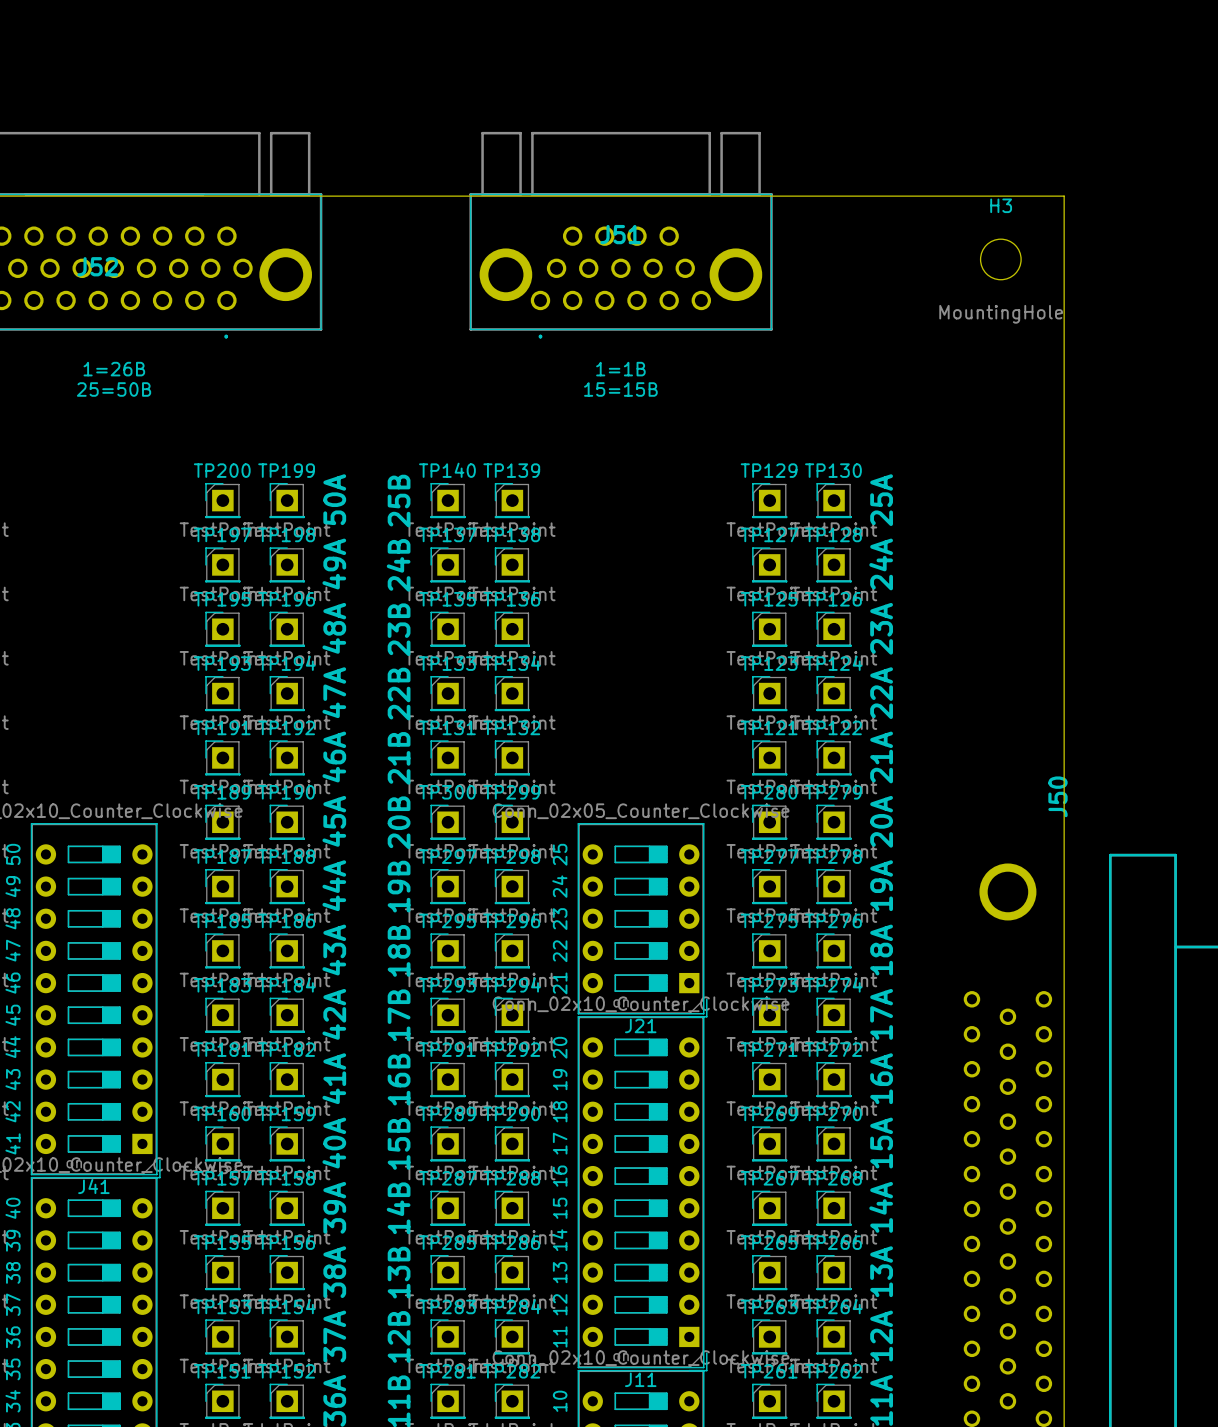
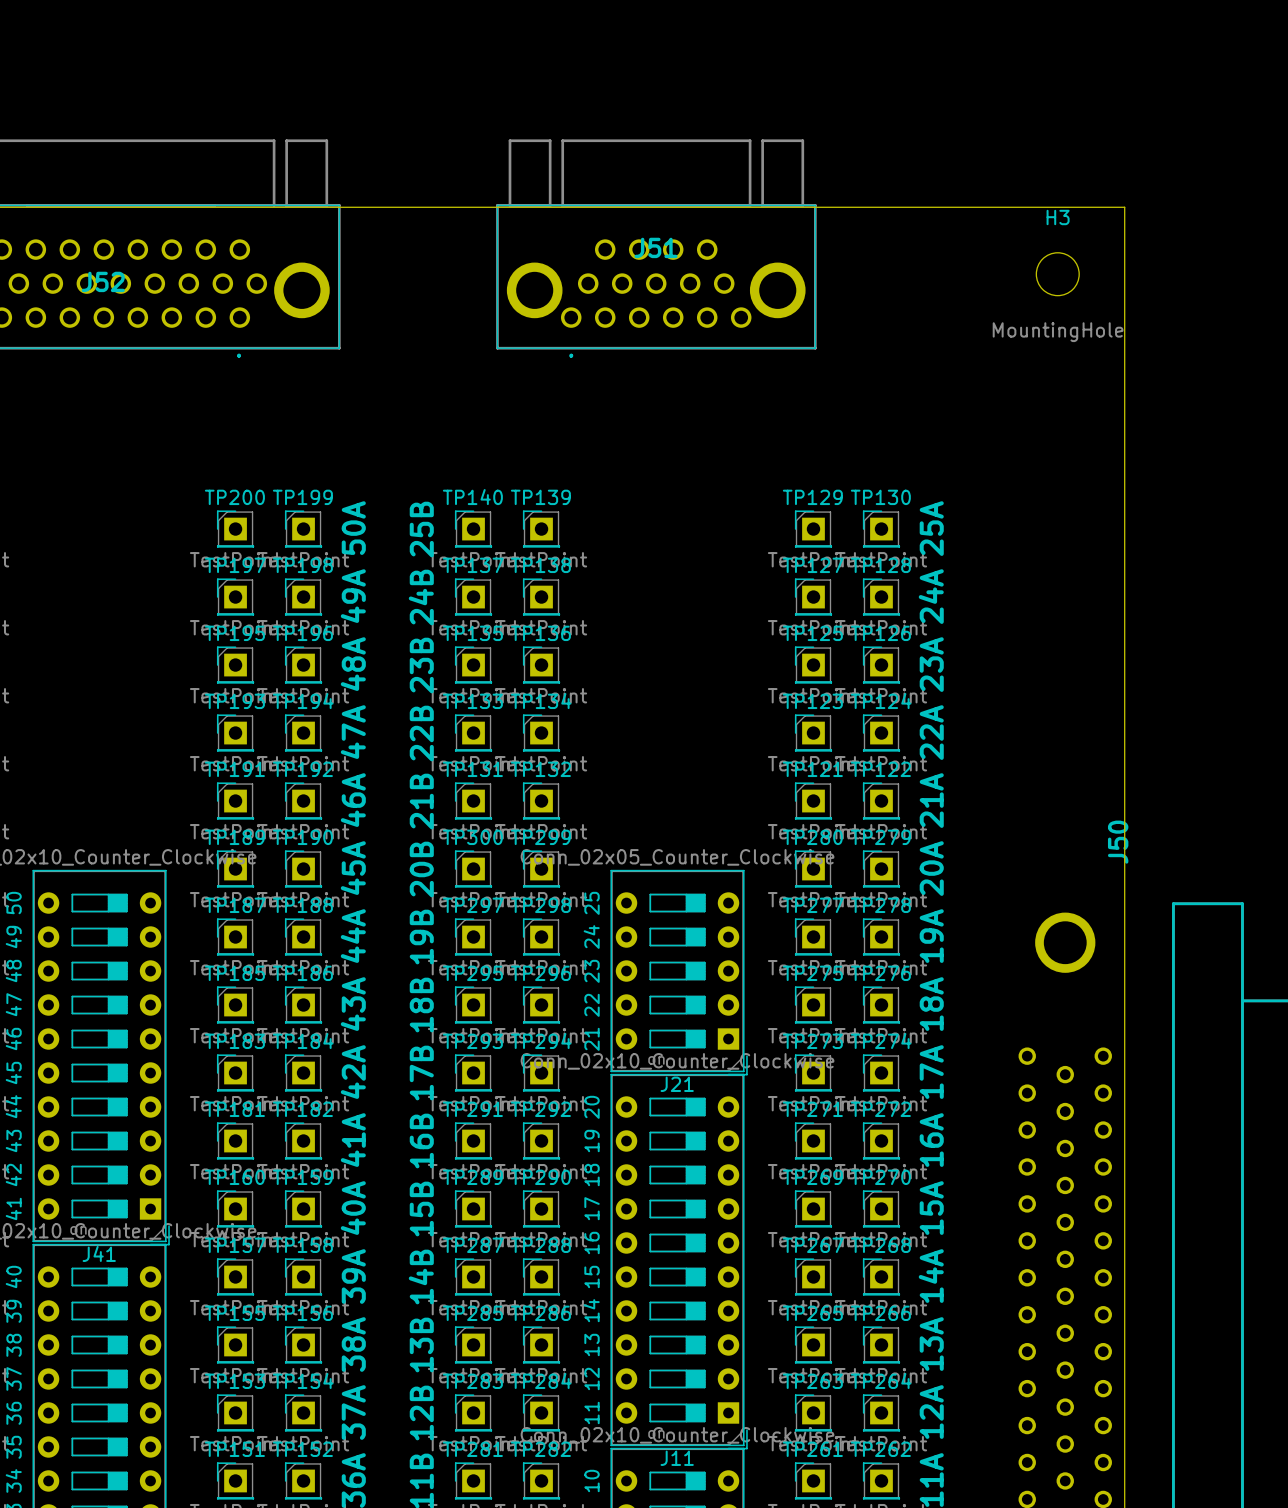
text: 1=26B (114, 369) -> none
text: 1=1B (620, 369) -> none
text: 25=50B (114, 389) -> none
text: 15=15B (620, 389) -> none

